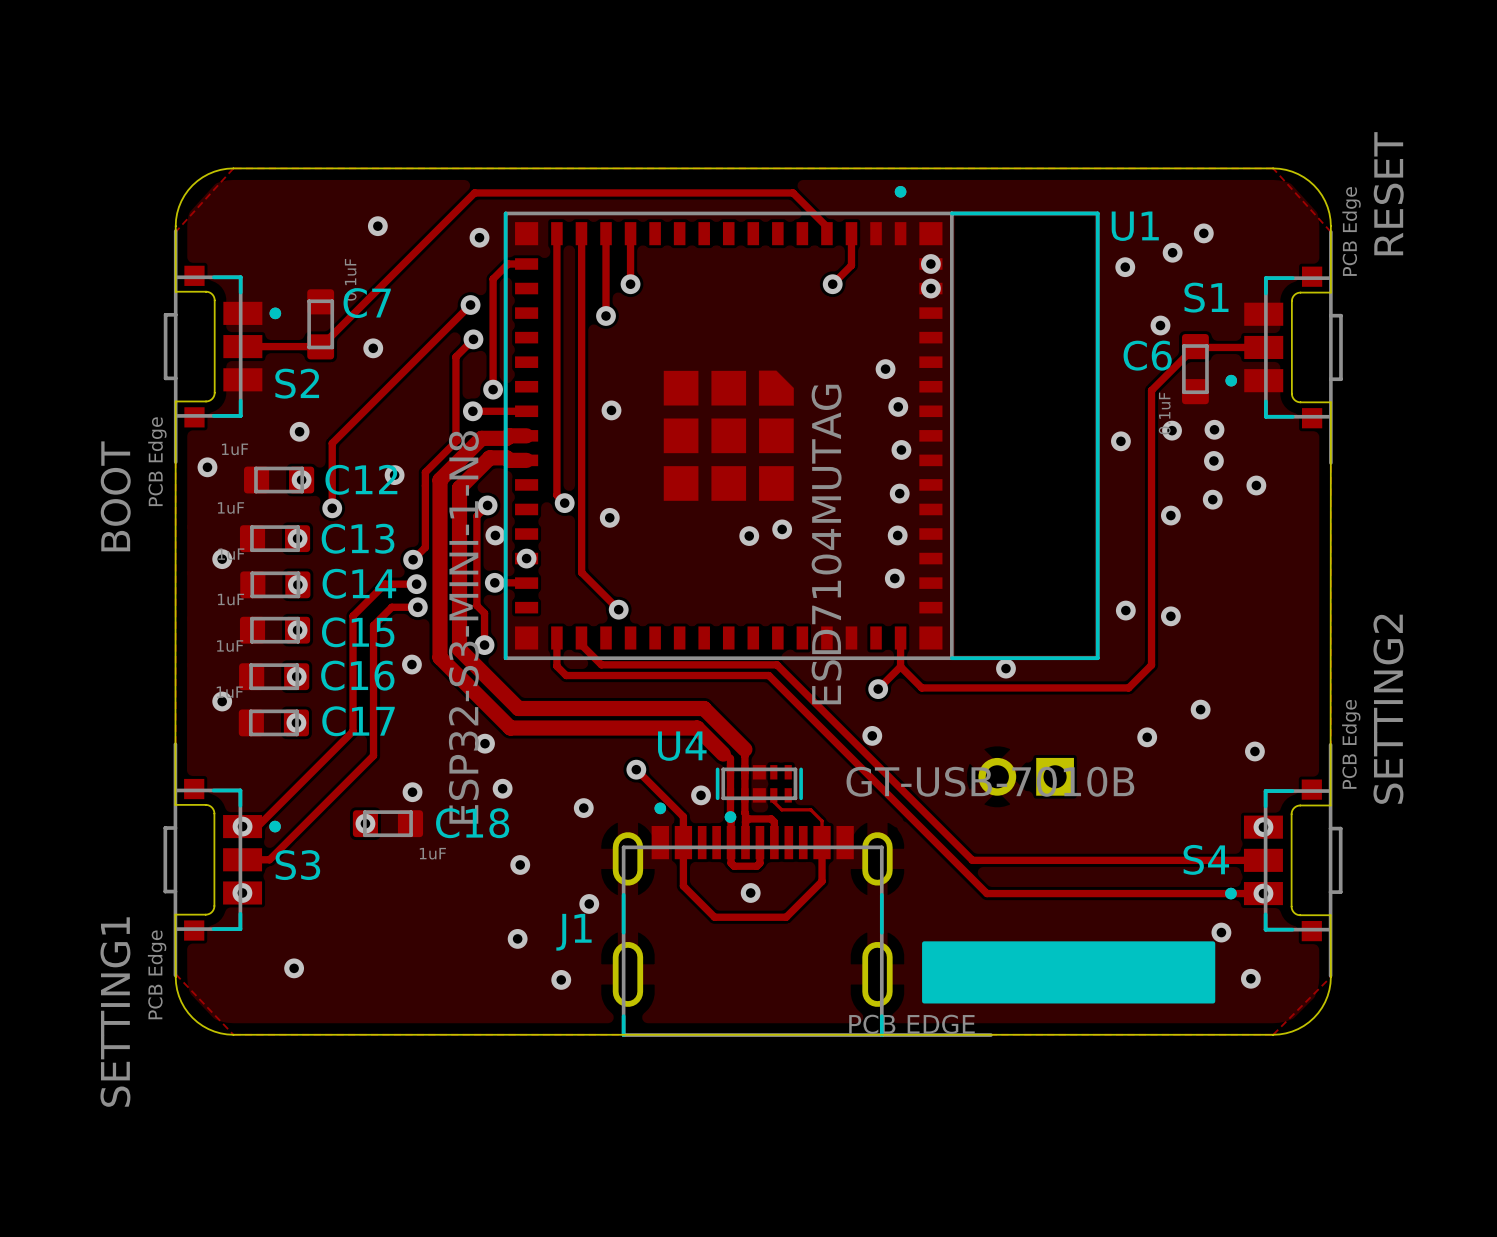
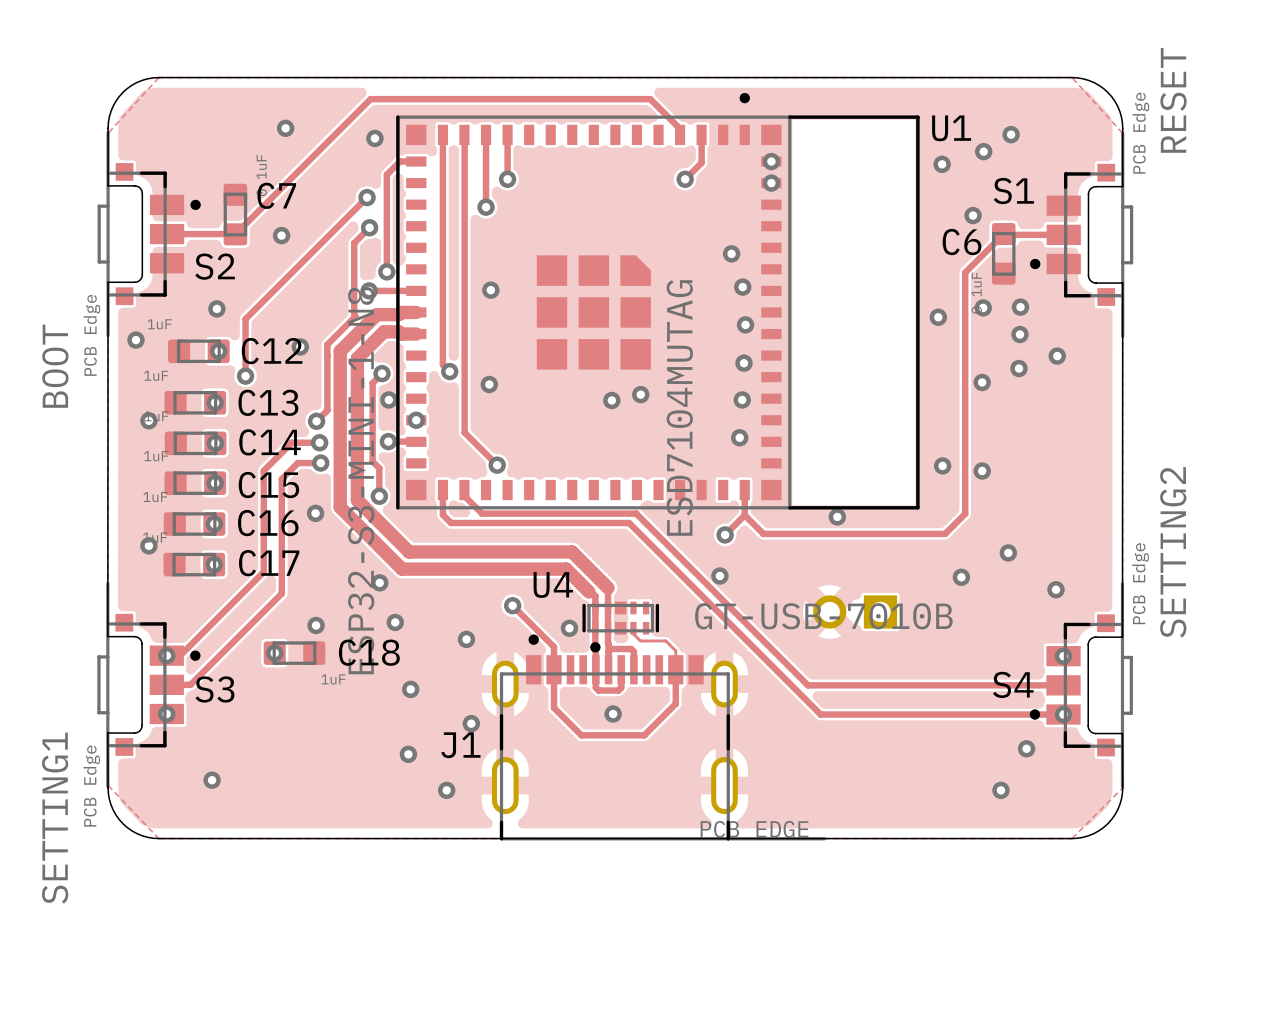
drawing: [922, 941, 1216, 1004] -> none
via position: (1250, 978) -> (1000, 790)

